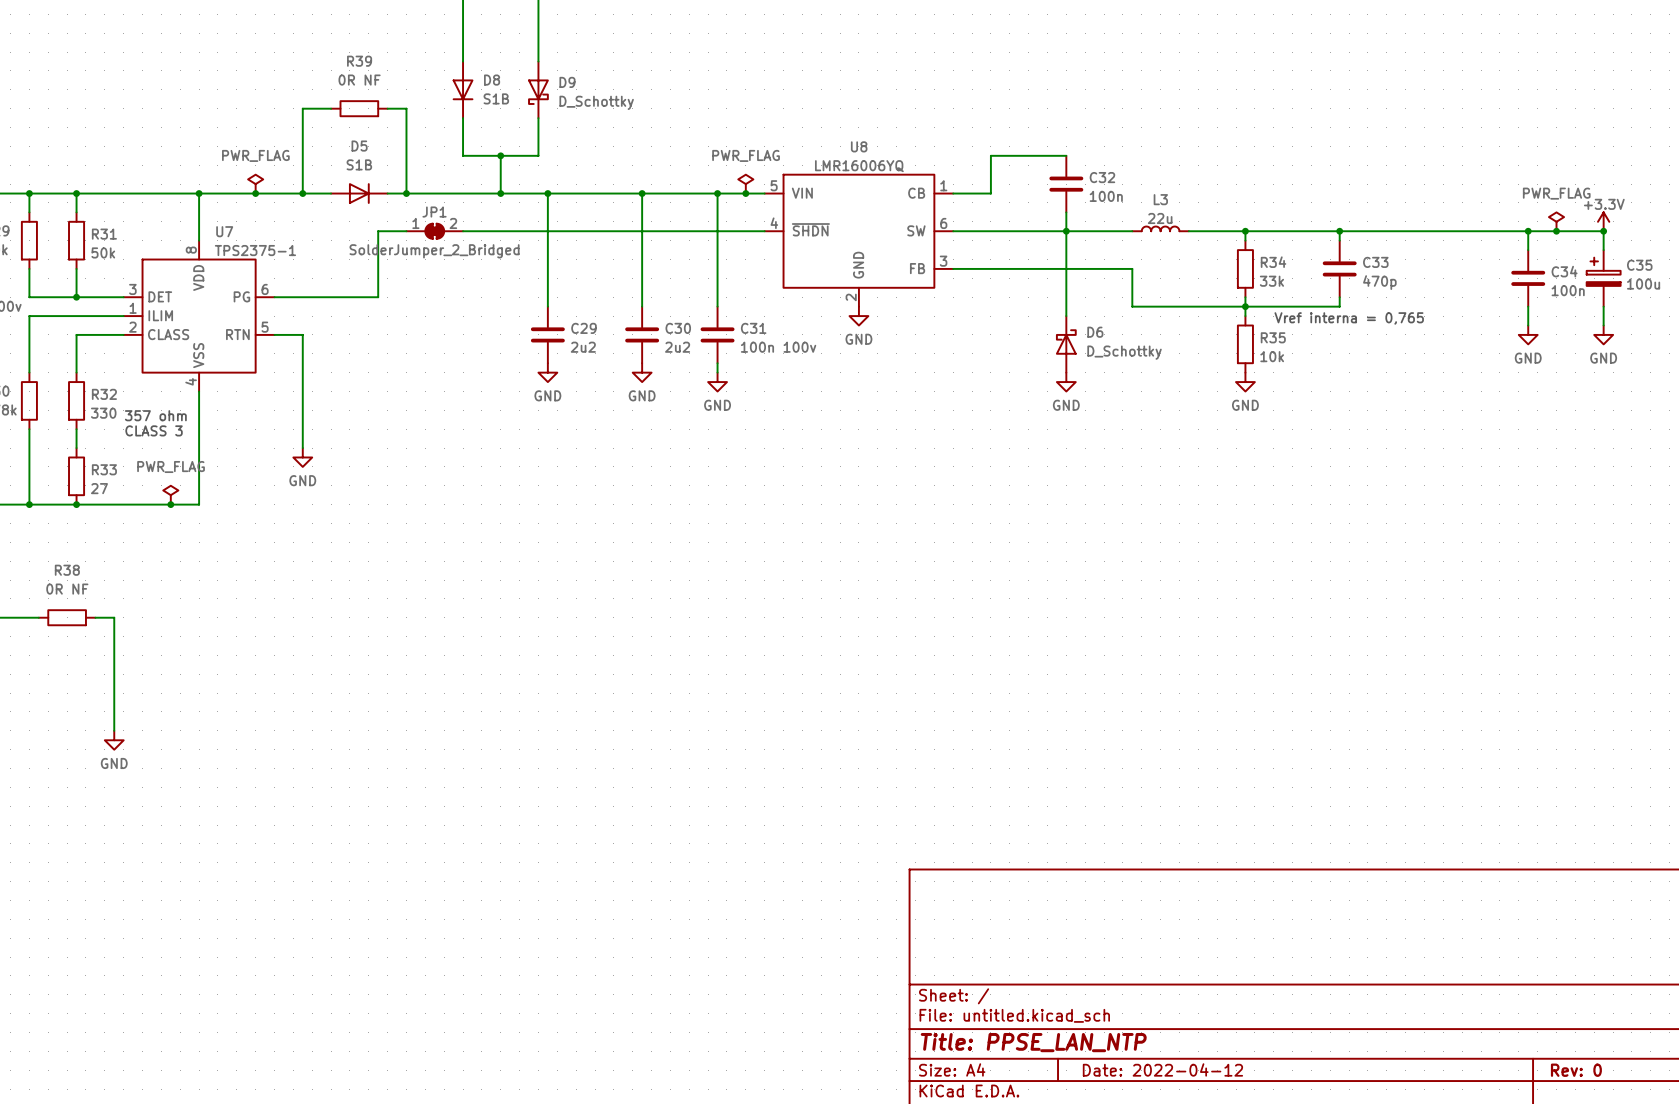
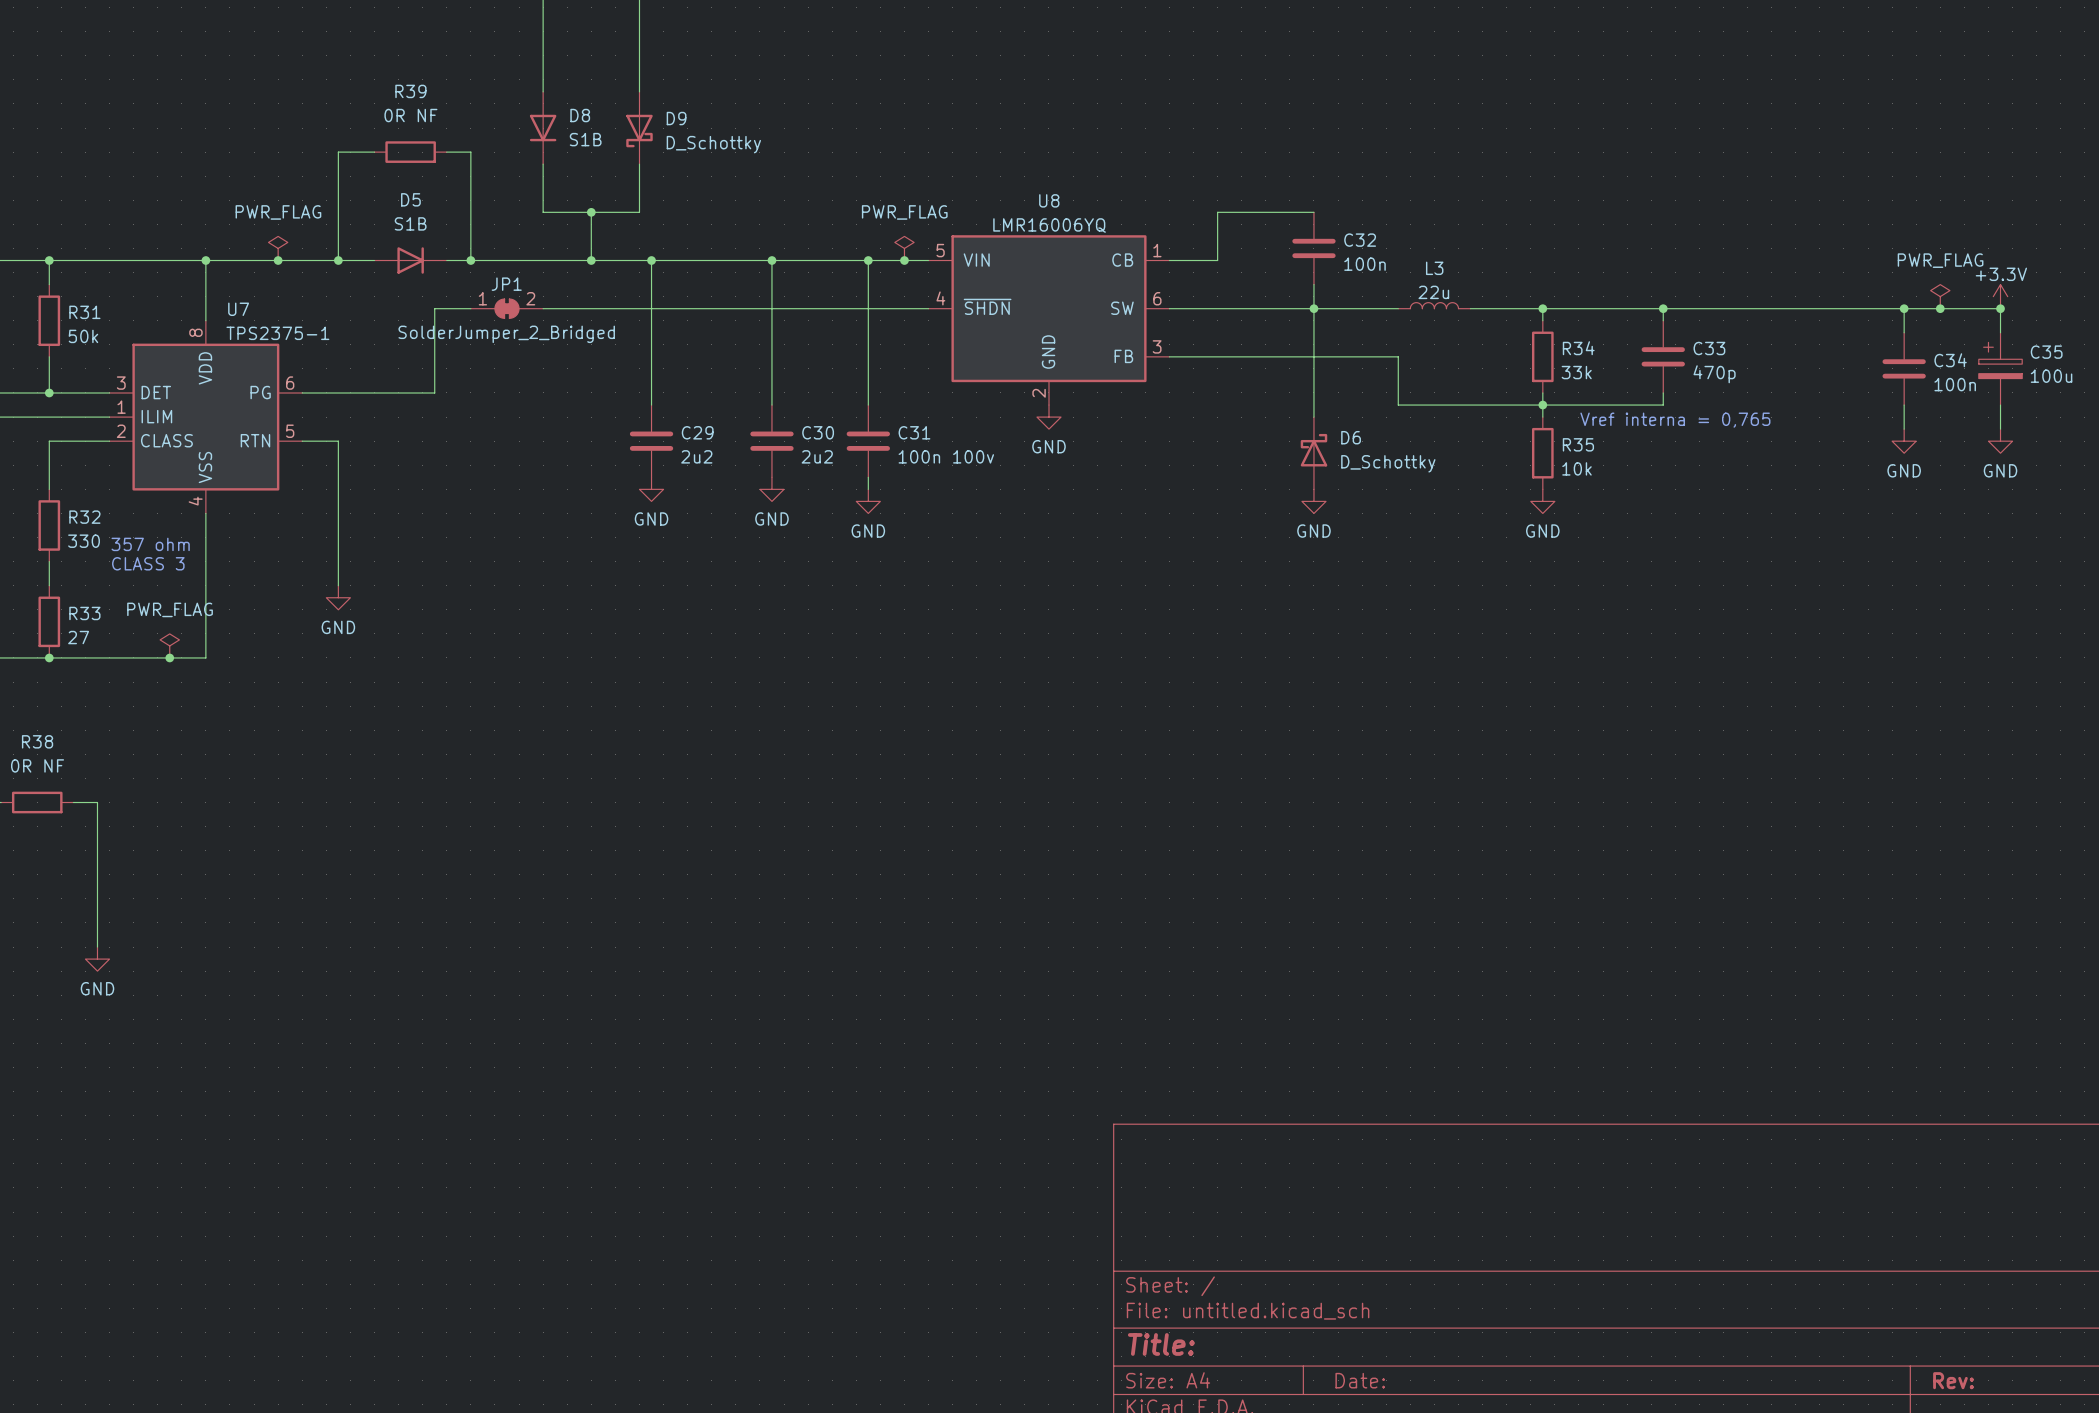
title block: Title: PPSE_LAN_NTP (1033, 1042) -> Title: (1161, 1344)
title block: Date: 2022-04-12 (1162, 1069) -> Date: (1360, 1380)
title block: Rev: 0 (1576, 1070) -> Rev: (1953, 1380)

